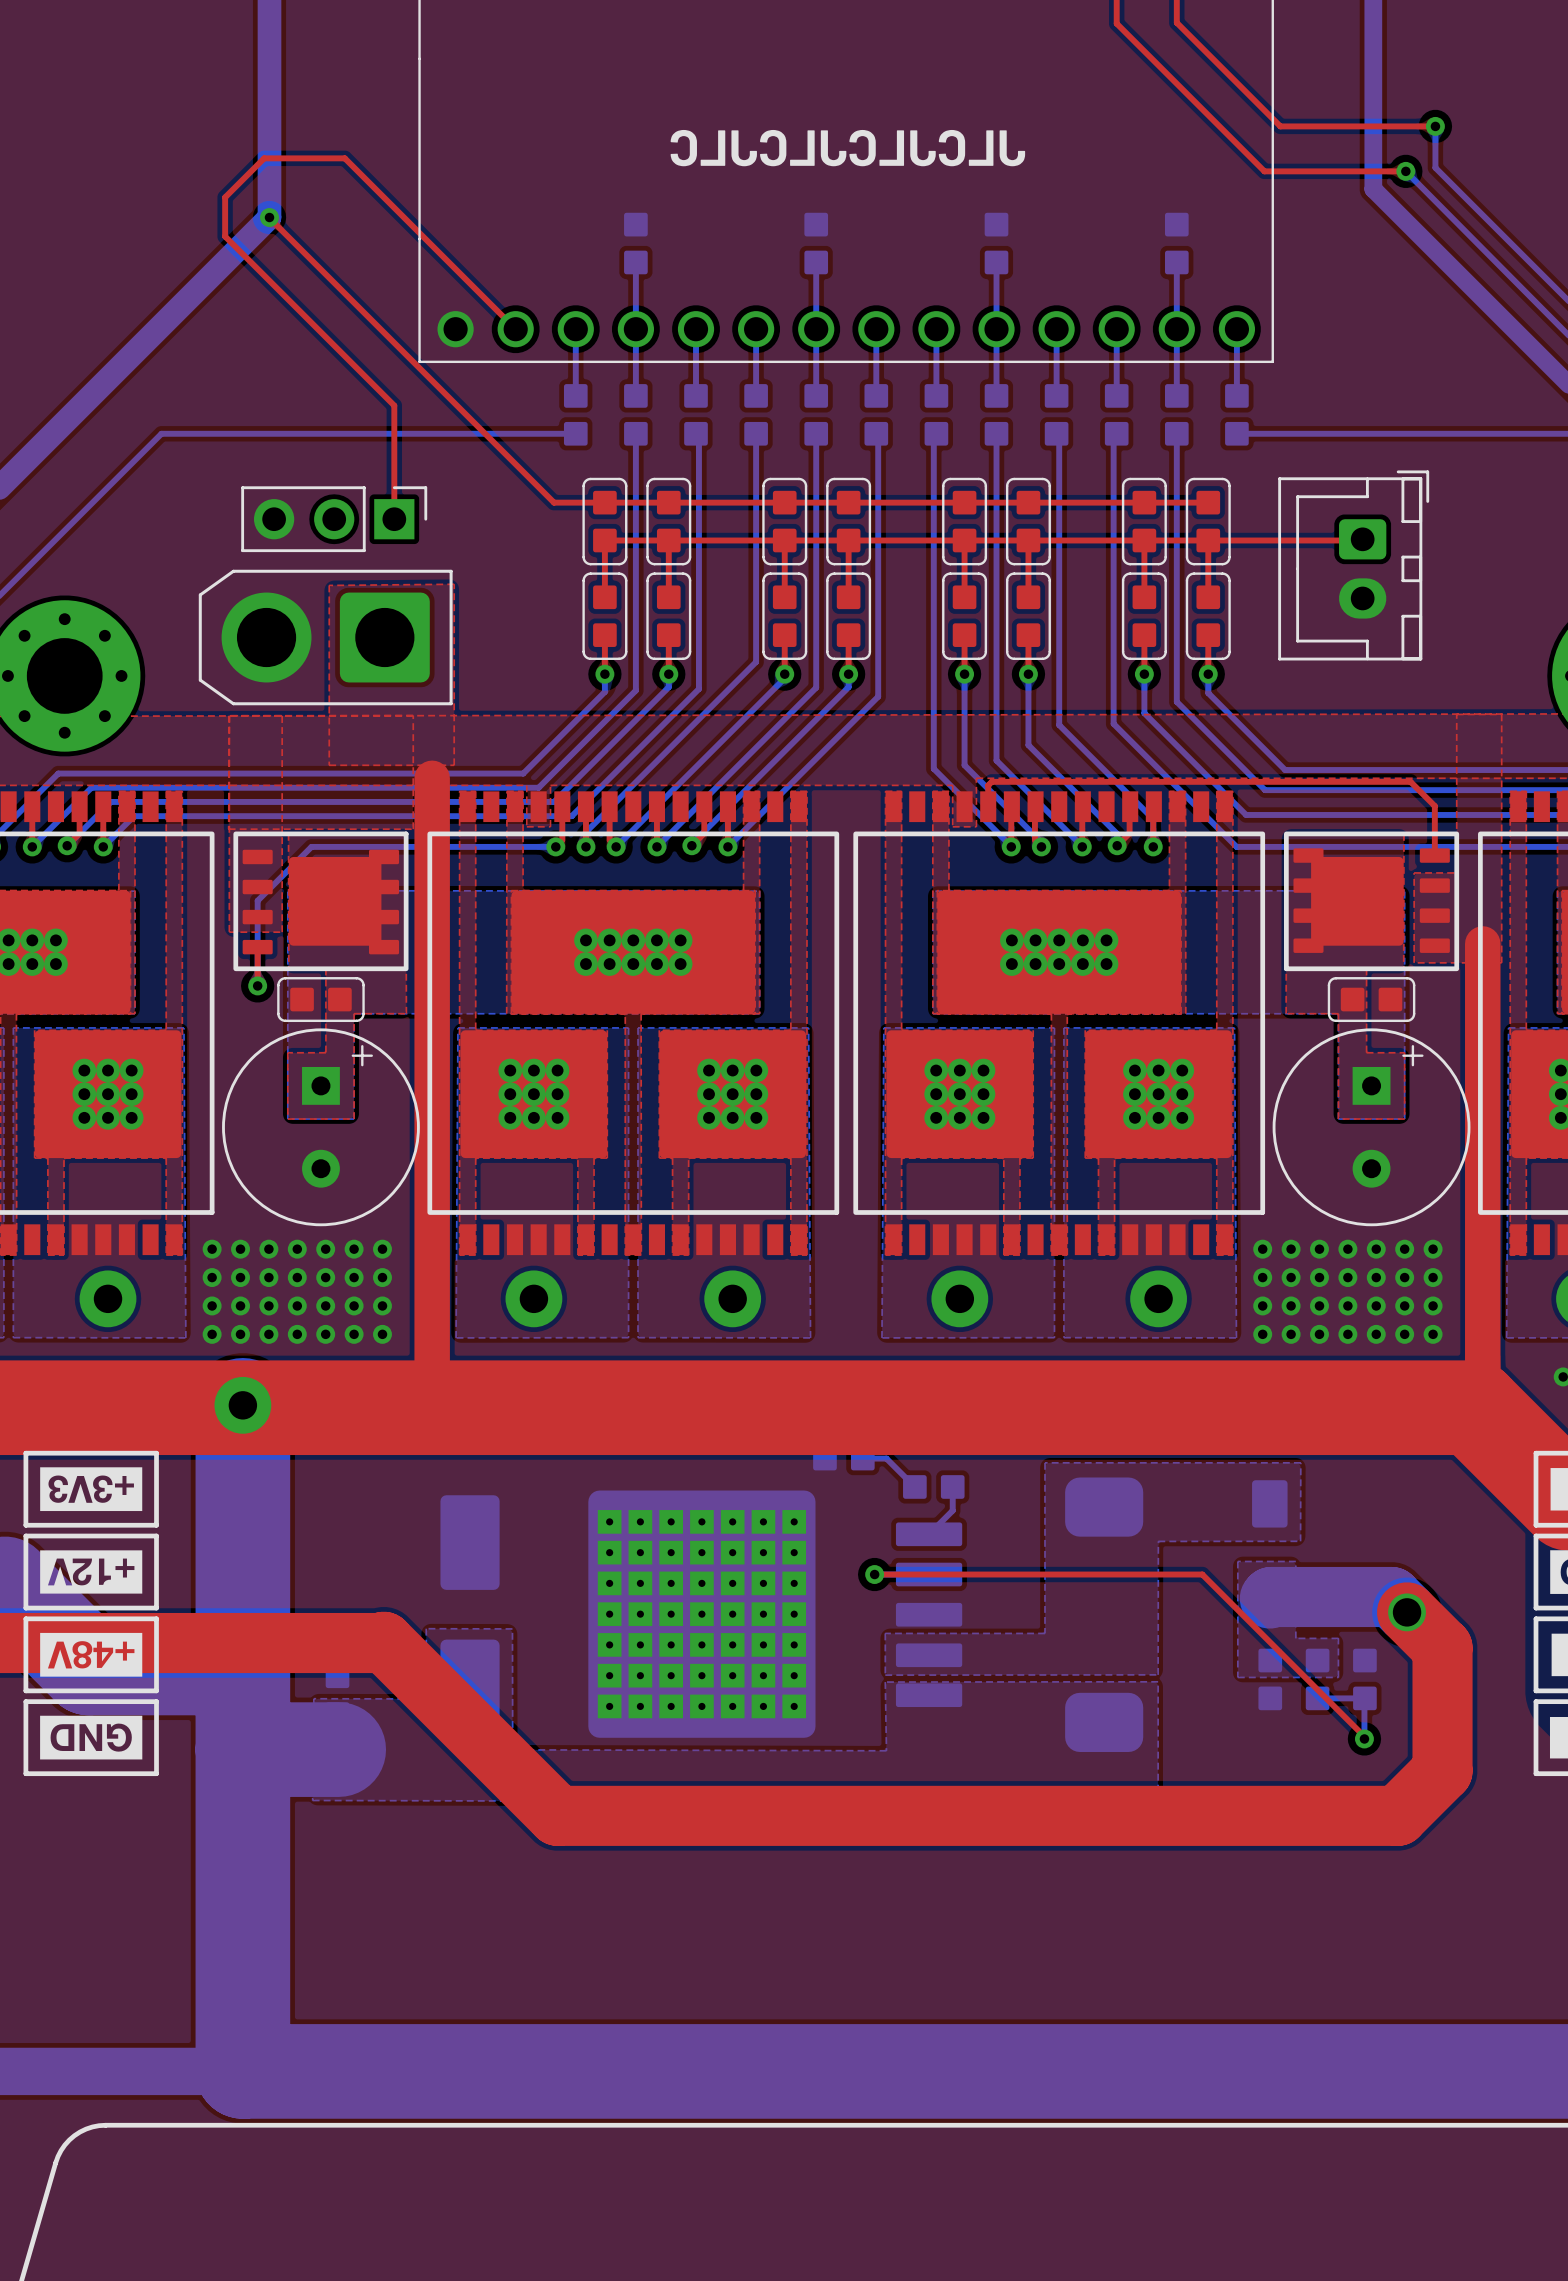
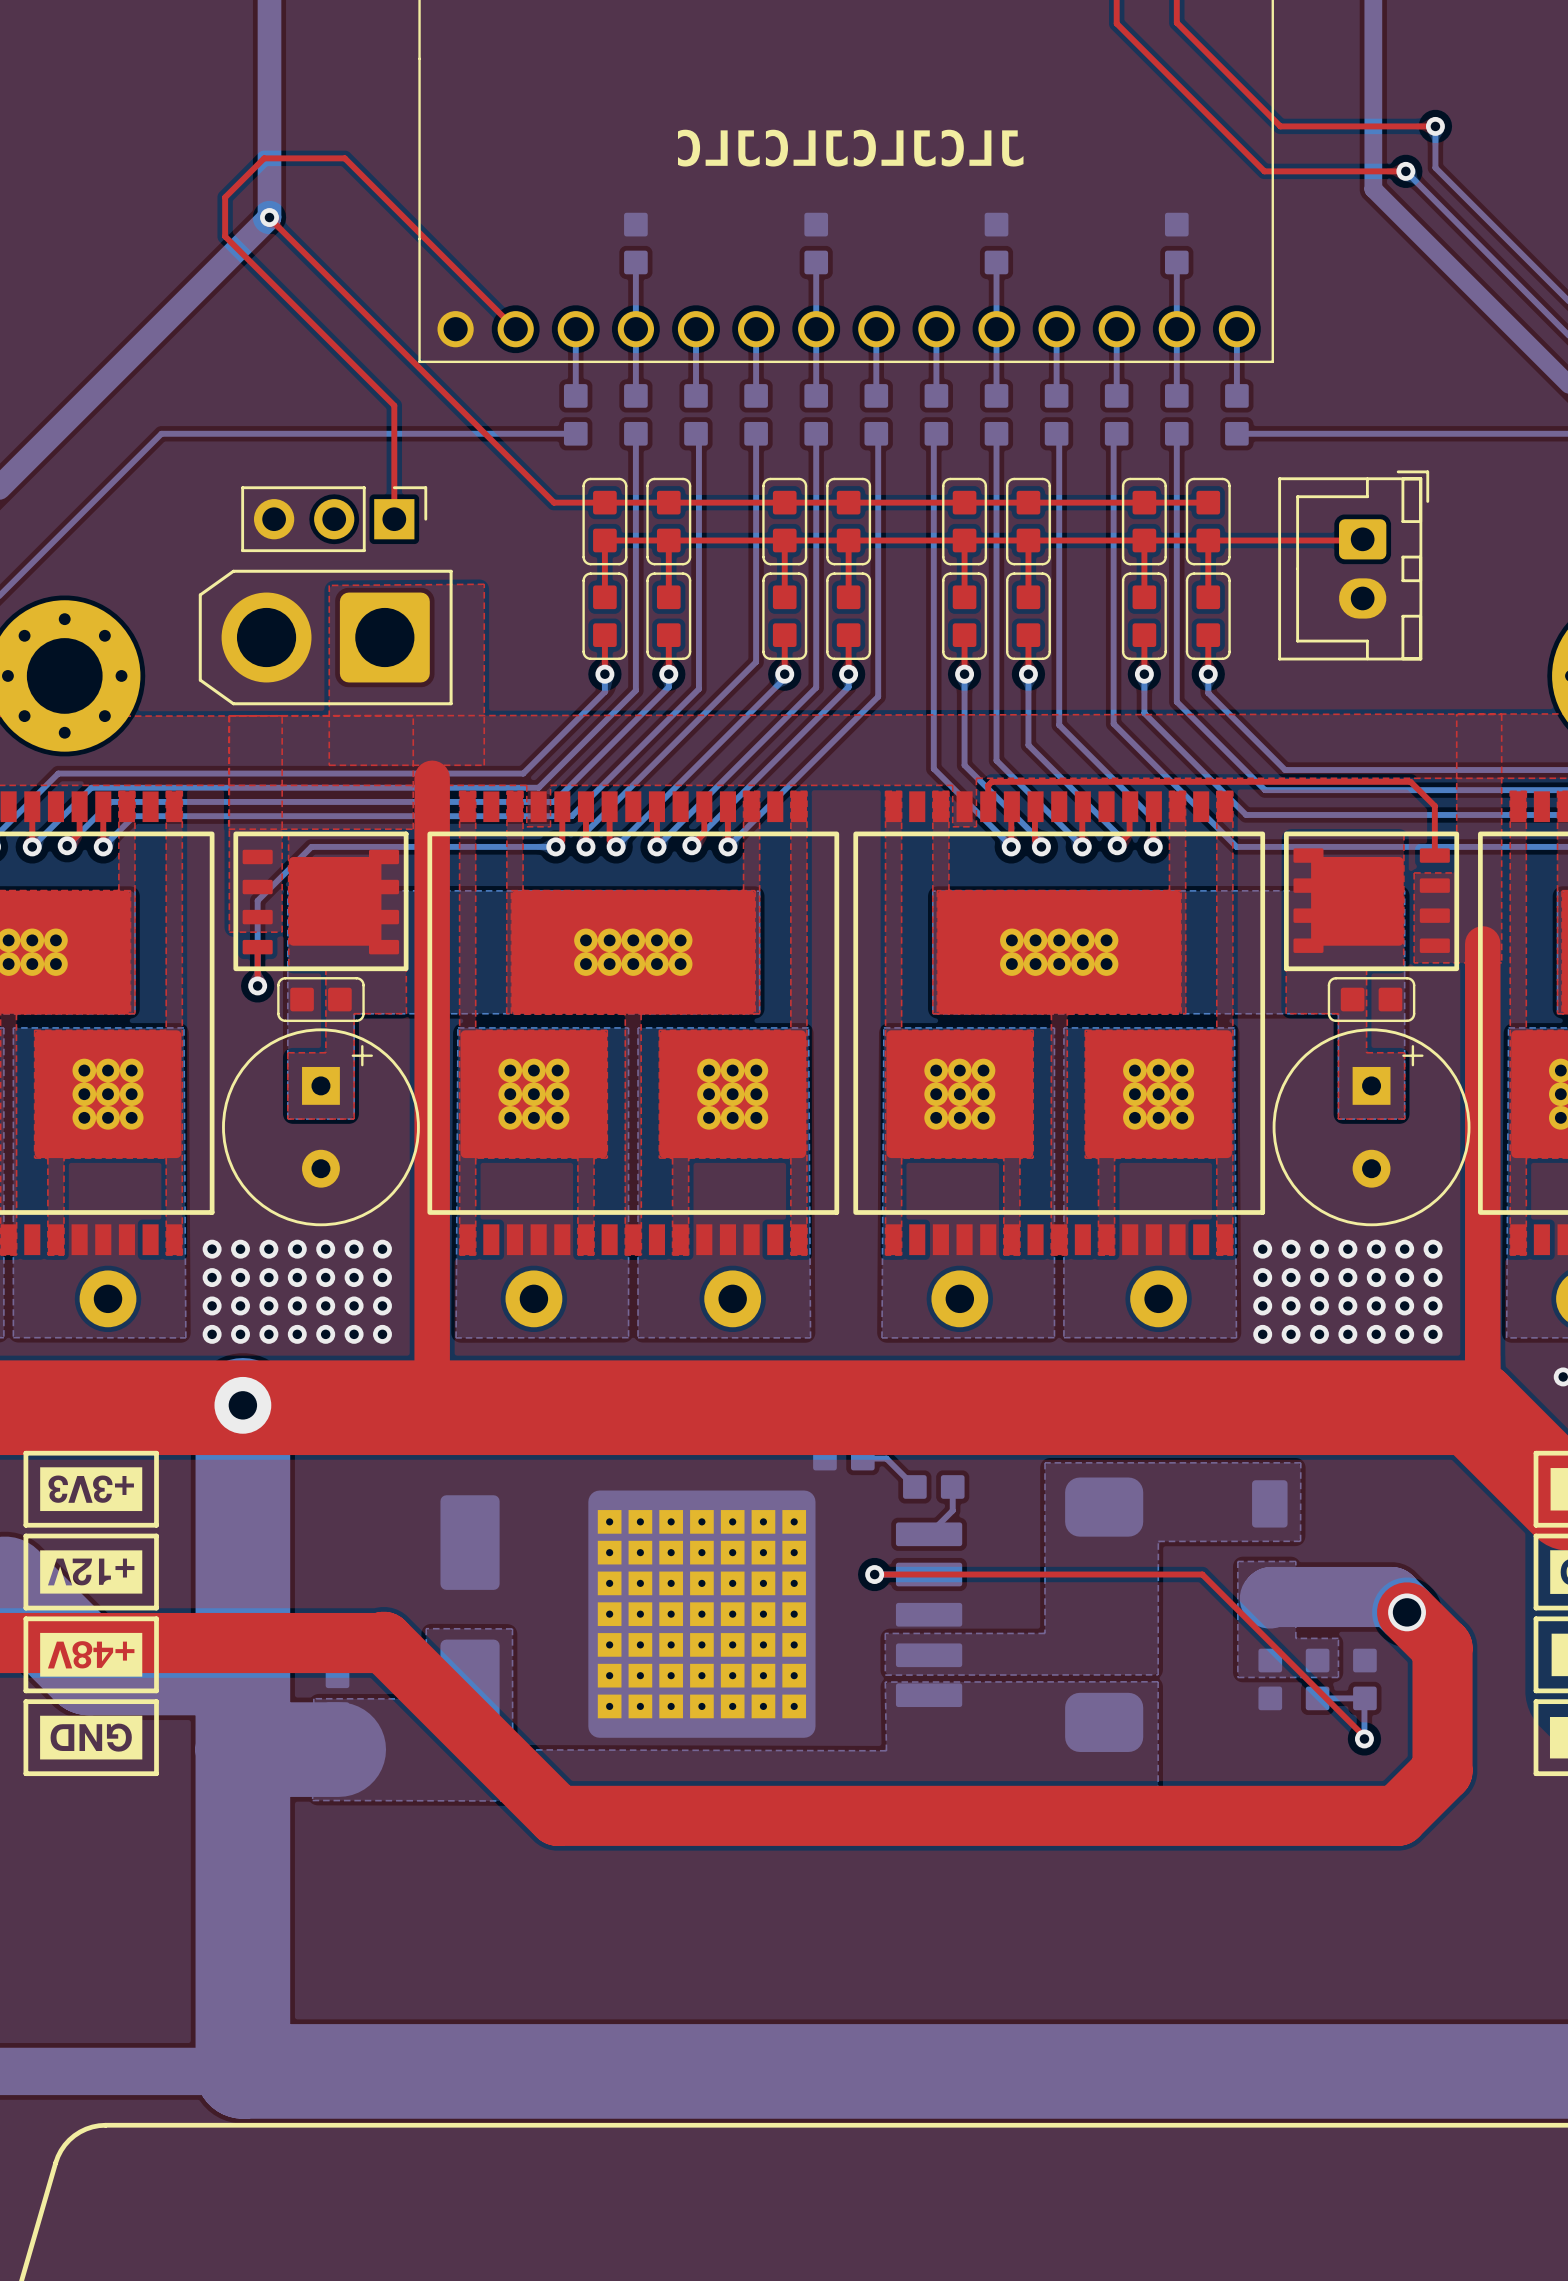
top zone outline: (329, 585) (454, 584) (454, 765) -> (329, 585) (484, 584) (484, 765) (454, 765)

